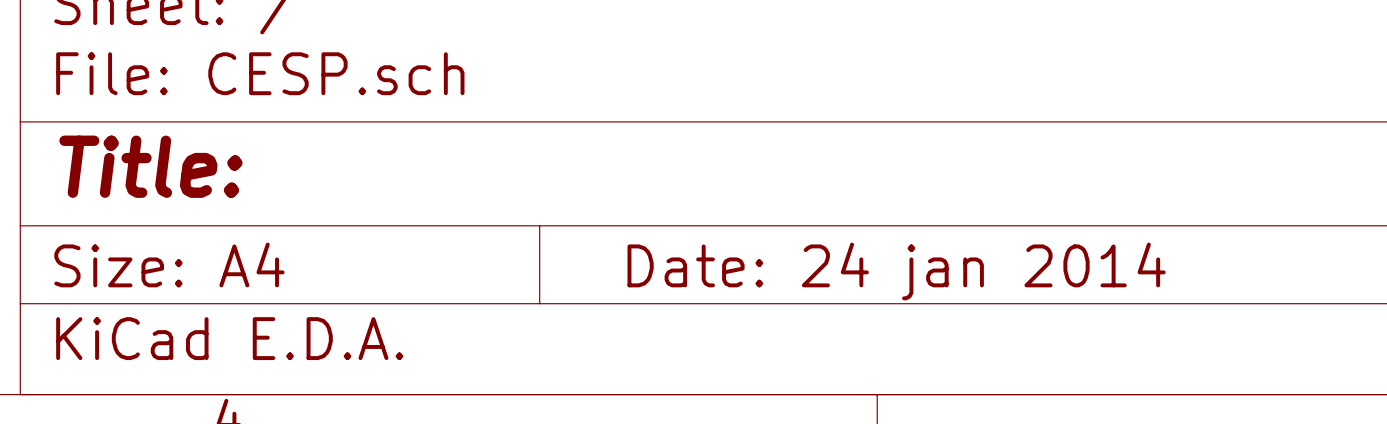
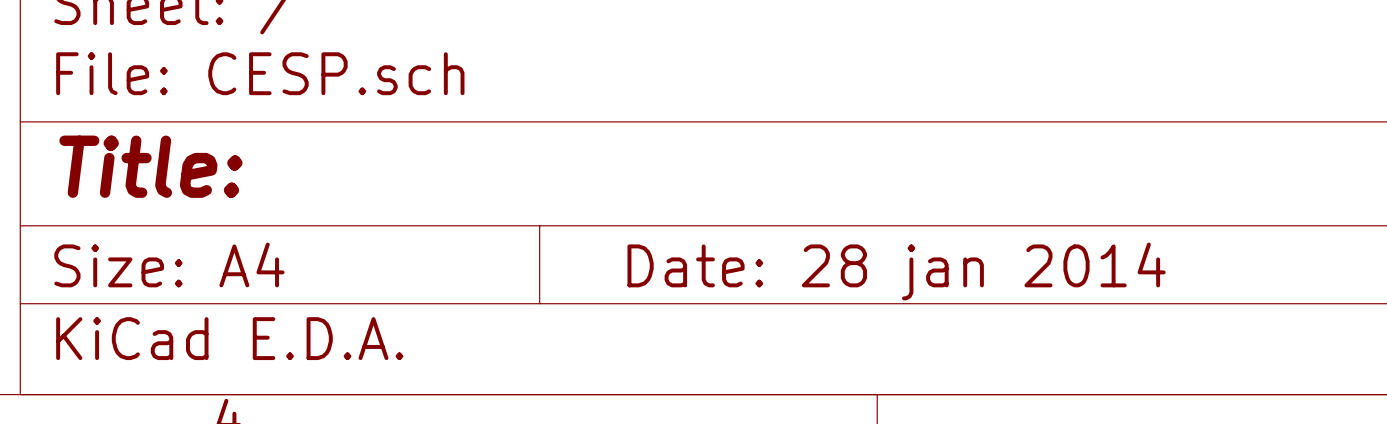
title block: Date: 24 jan 2014 (896, 271) -> Date: 28 jan 2014 (896, 271)

